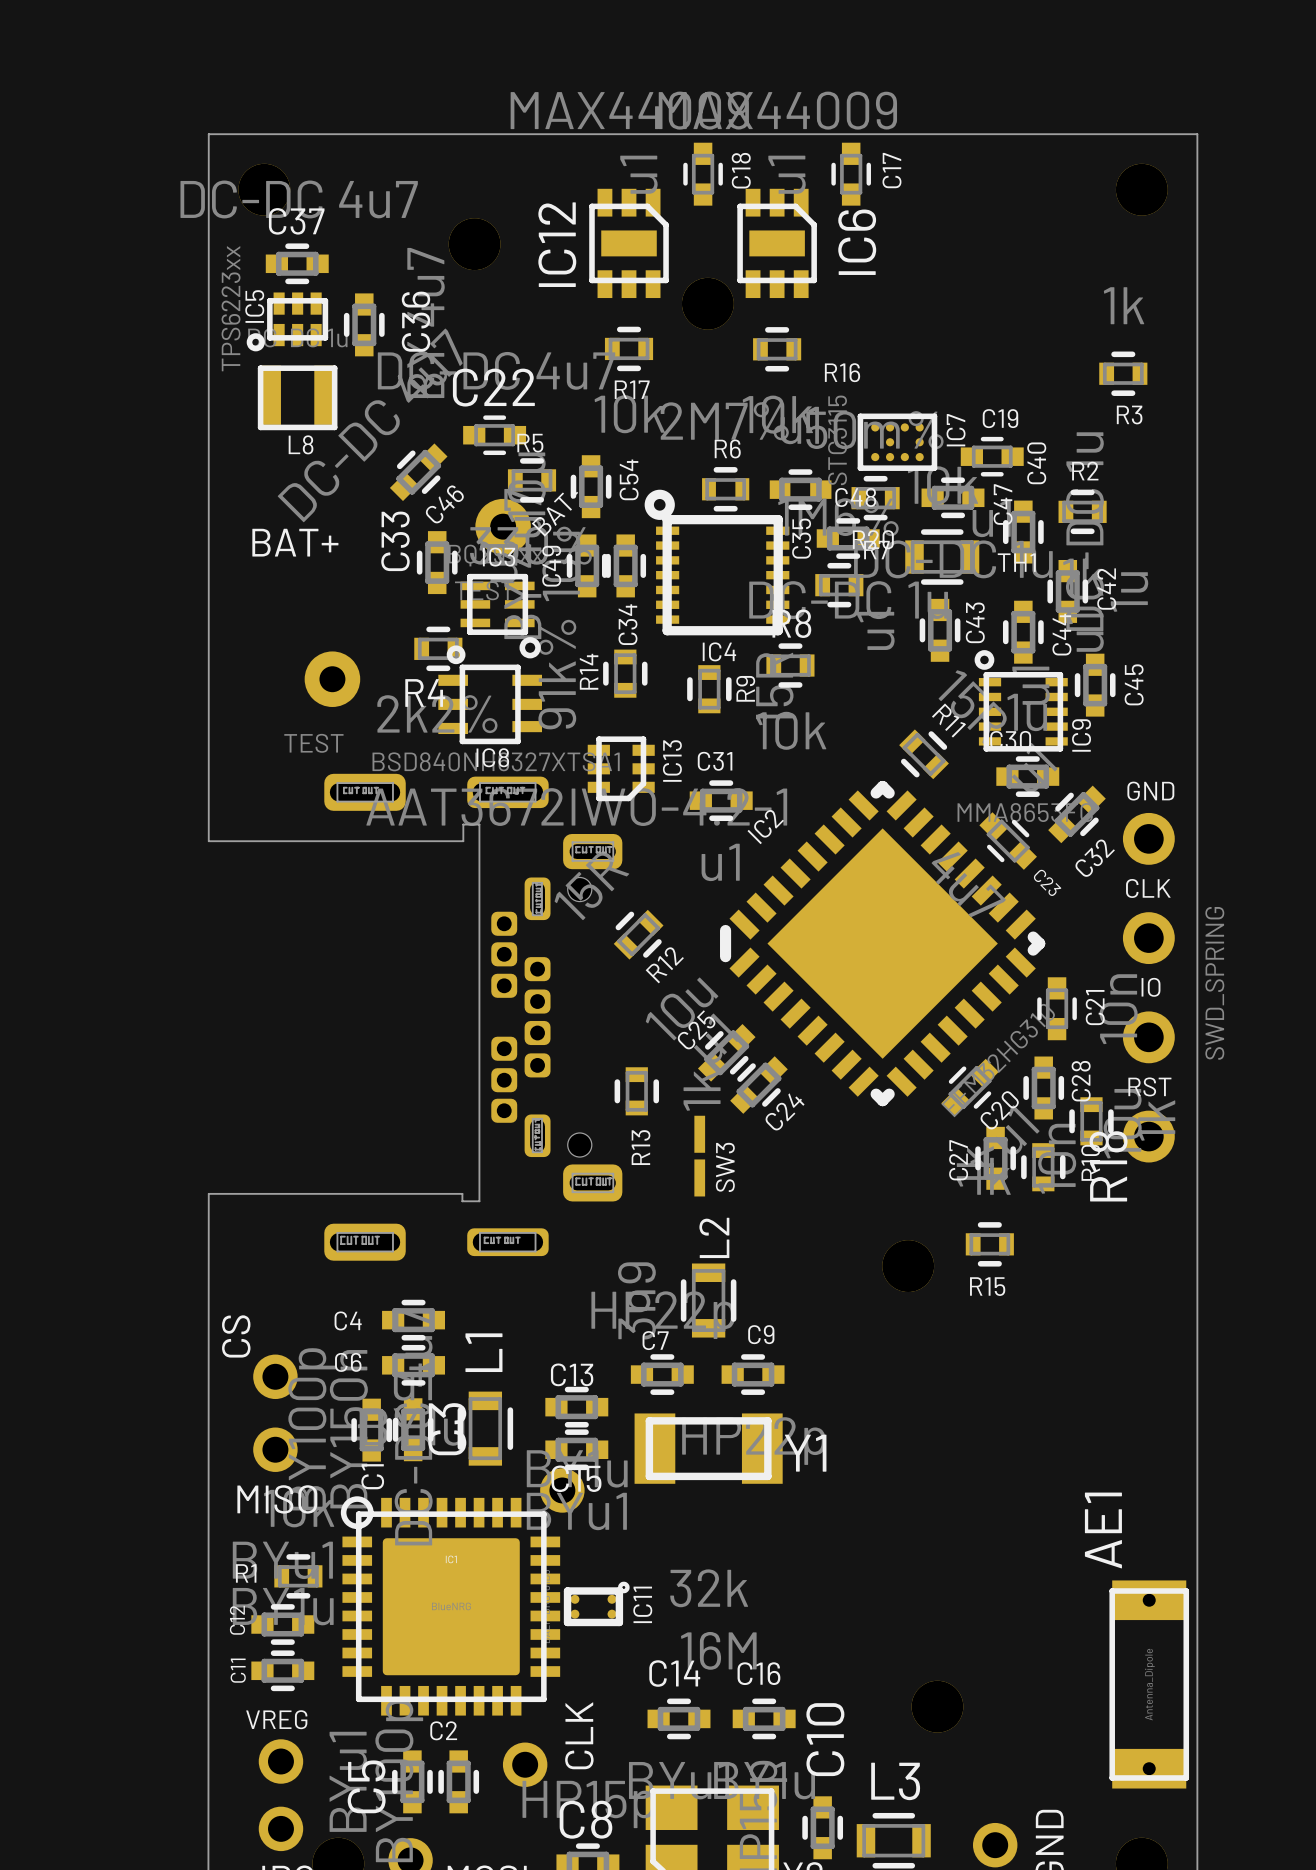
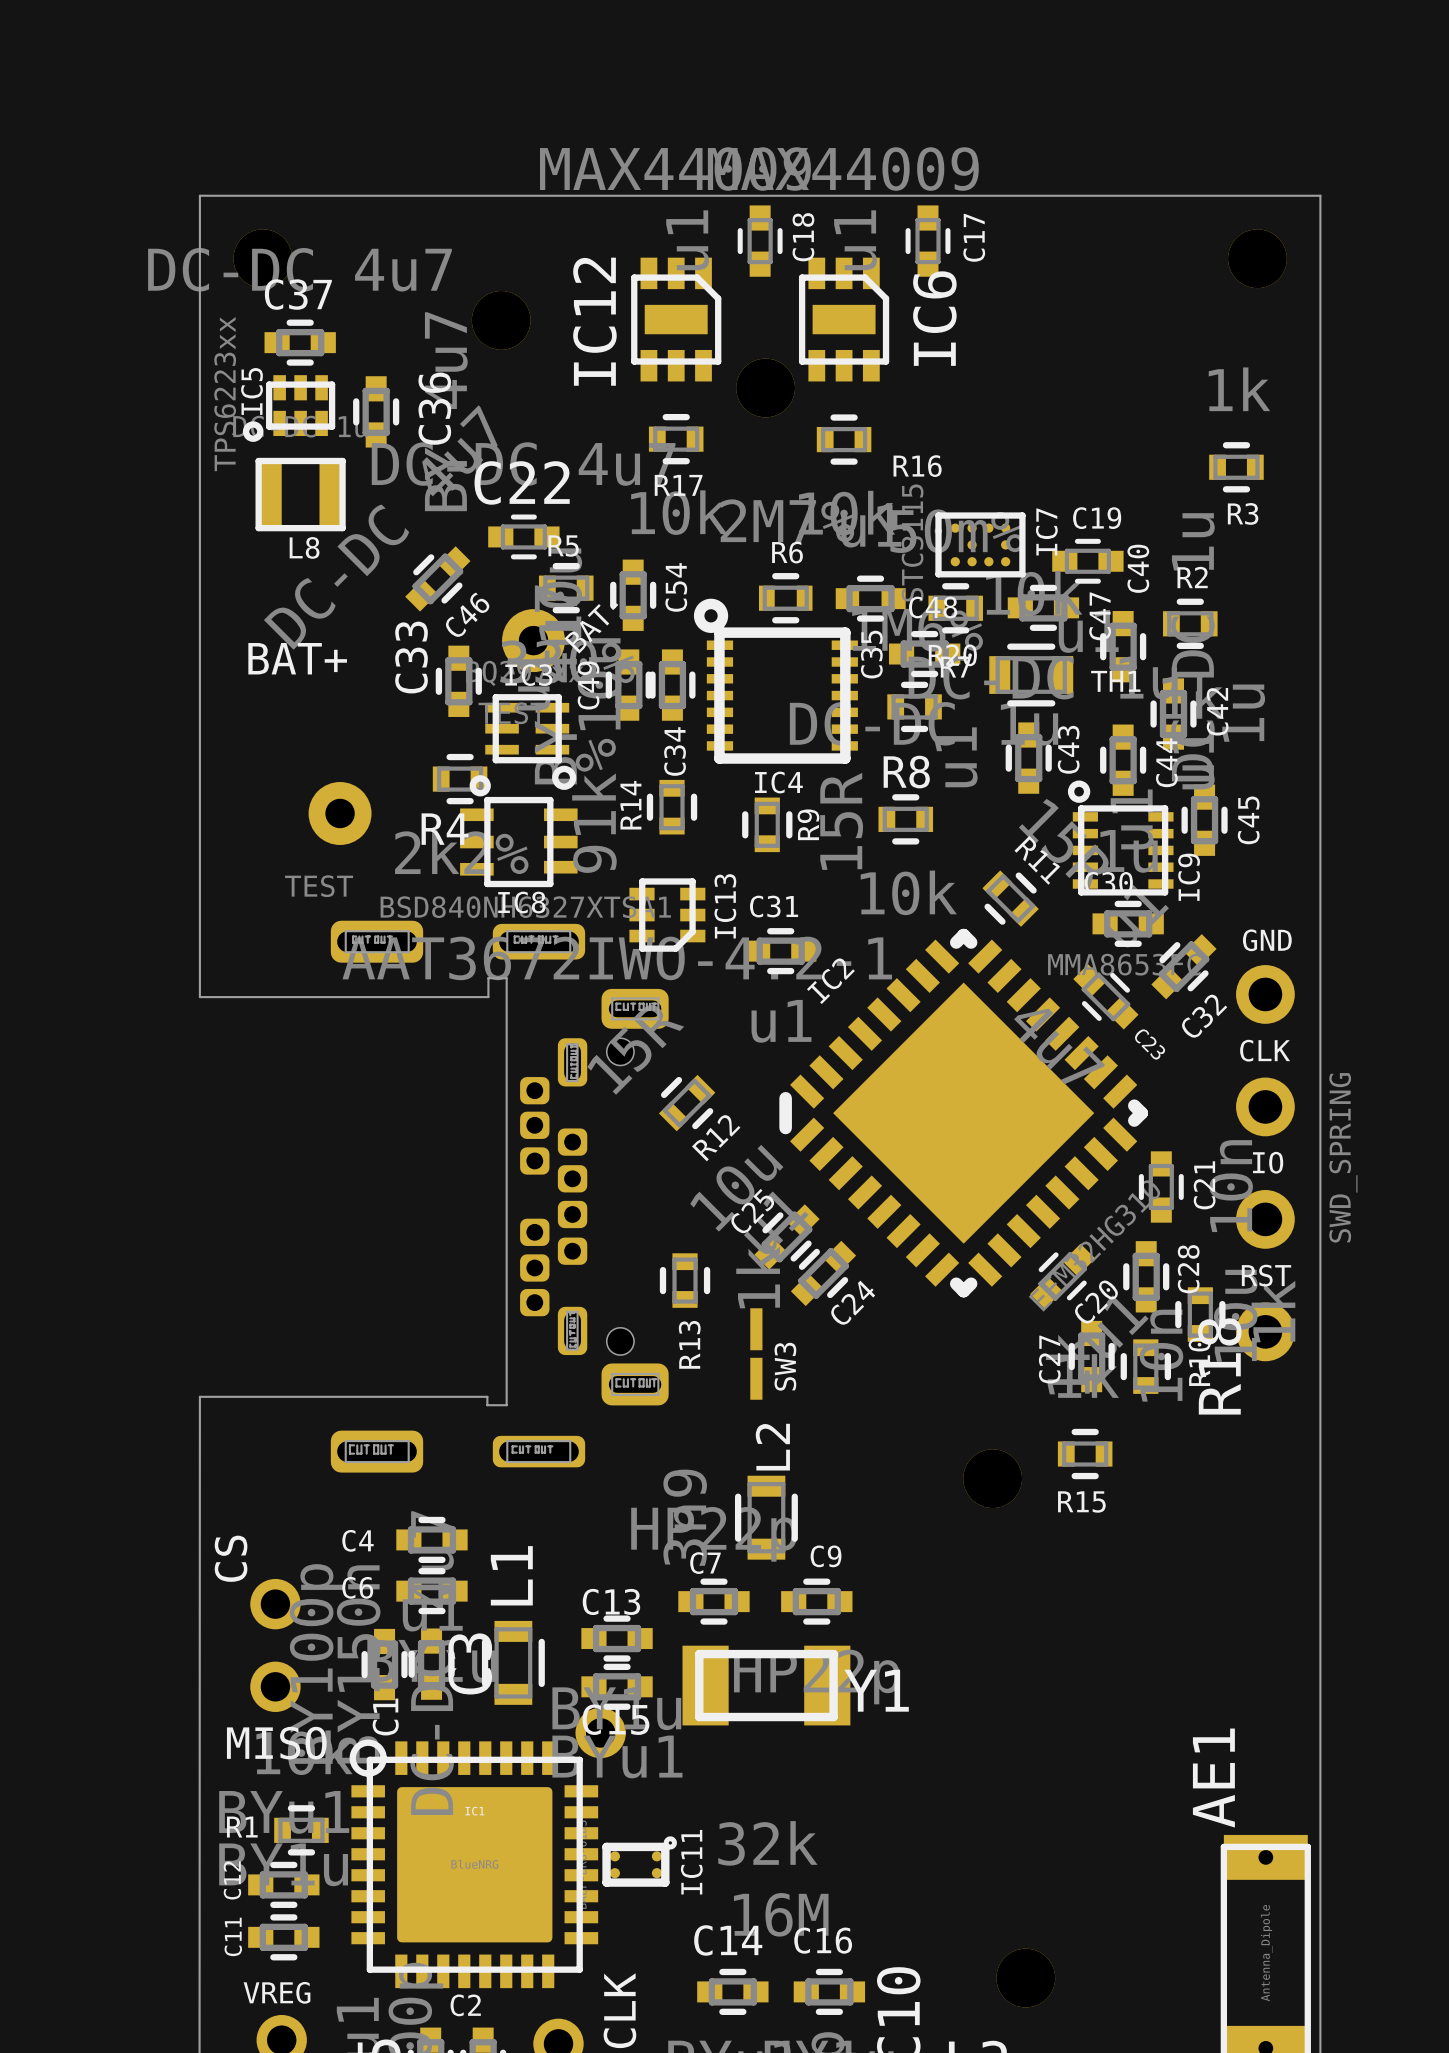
R8 position: (790, 665) -> (905, 819)

